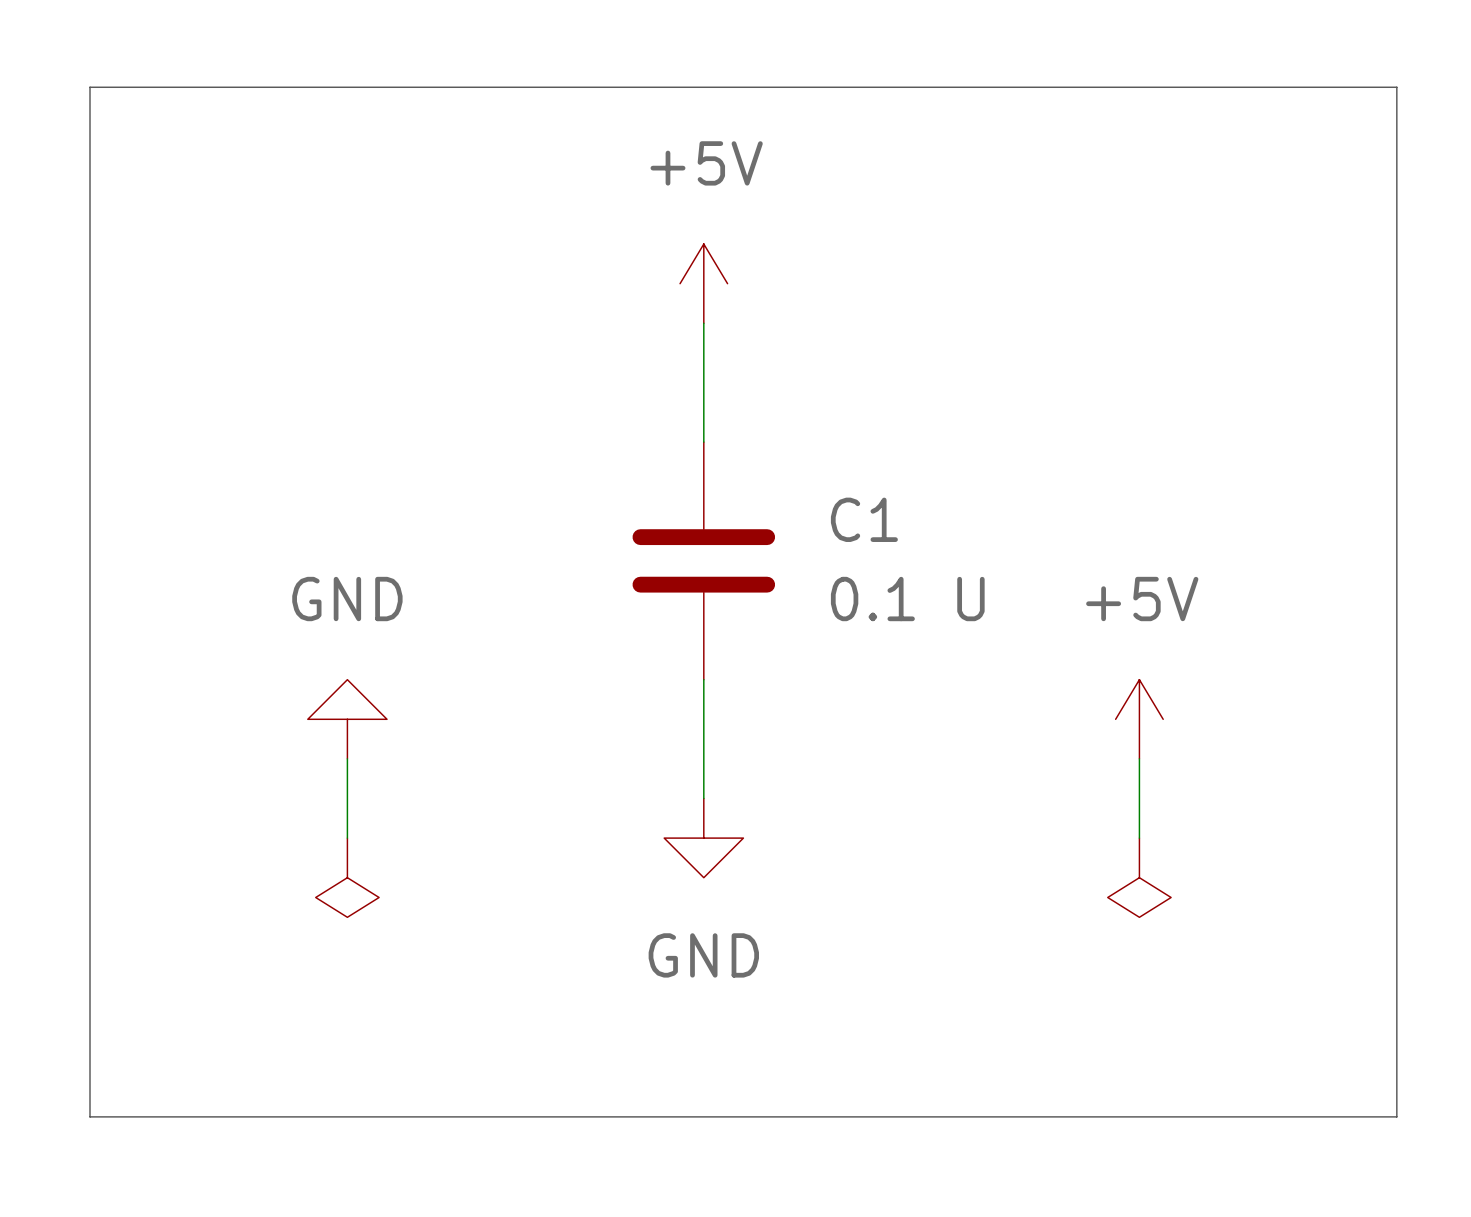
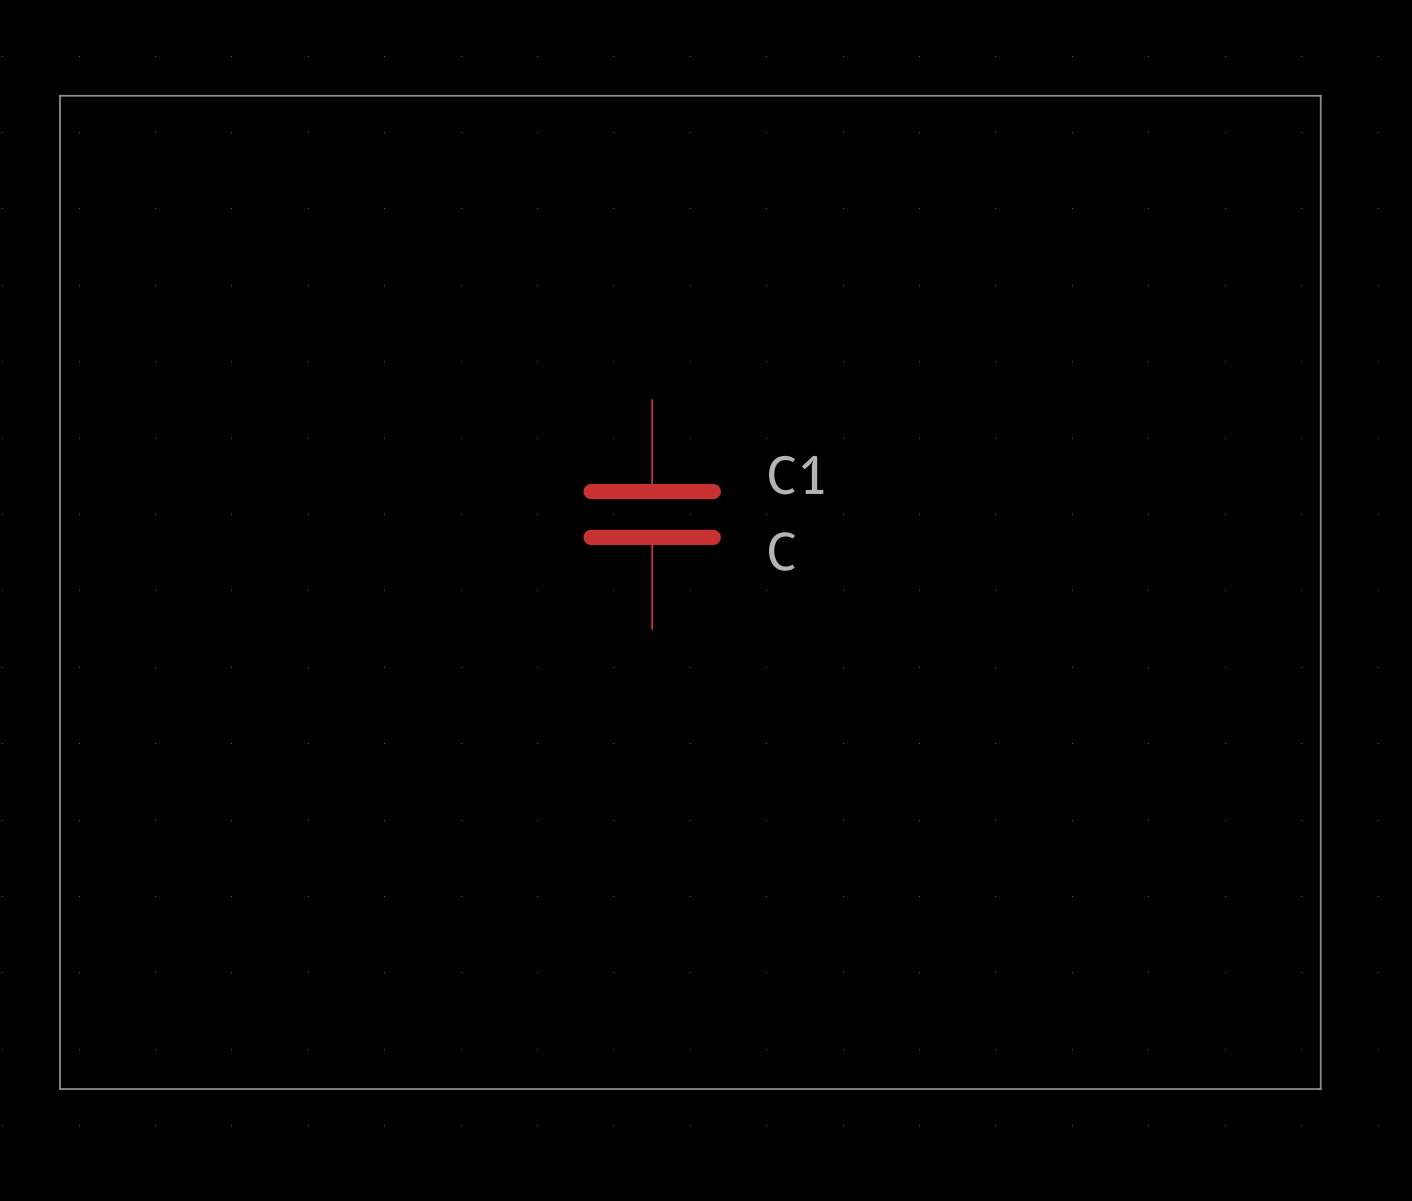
power symbol: +5V (703, 283) -> none
wire: (703, 323) (703, 442) -> none
C1 position: (703, 560) -> (652, 514)
C1 value: 0.1 U (907, 599) -> C (782, 551)
wire: (703, 679) (703, 798) -> none
power symbol: GND (347, 719) -> none
power symbol: +5V (1139, 719) -> none
wire: (347, 758) (347, 838) -> none
wire: (1139, 758) (1139, 838) -> none
power symbol: GND (703, 838) -> none
power symbol: (347, 877) -> none
power symbol: (1139, 877) -> none

